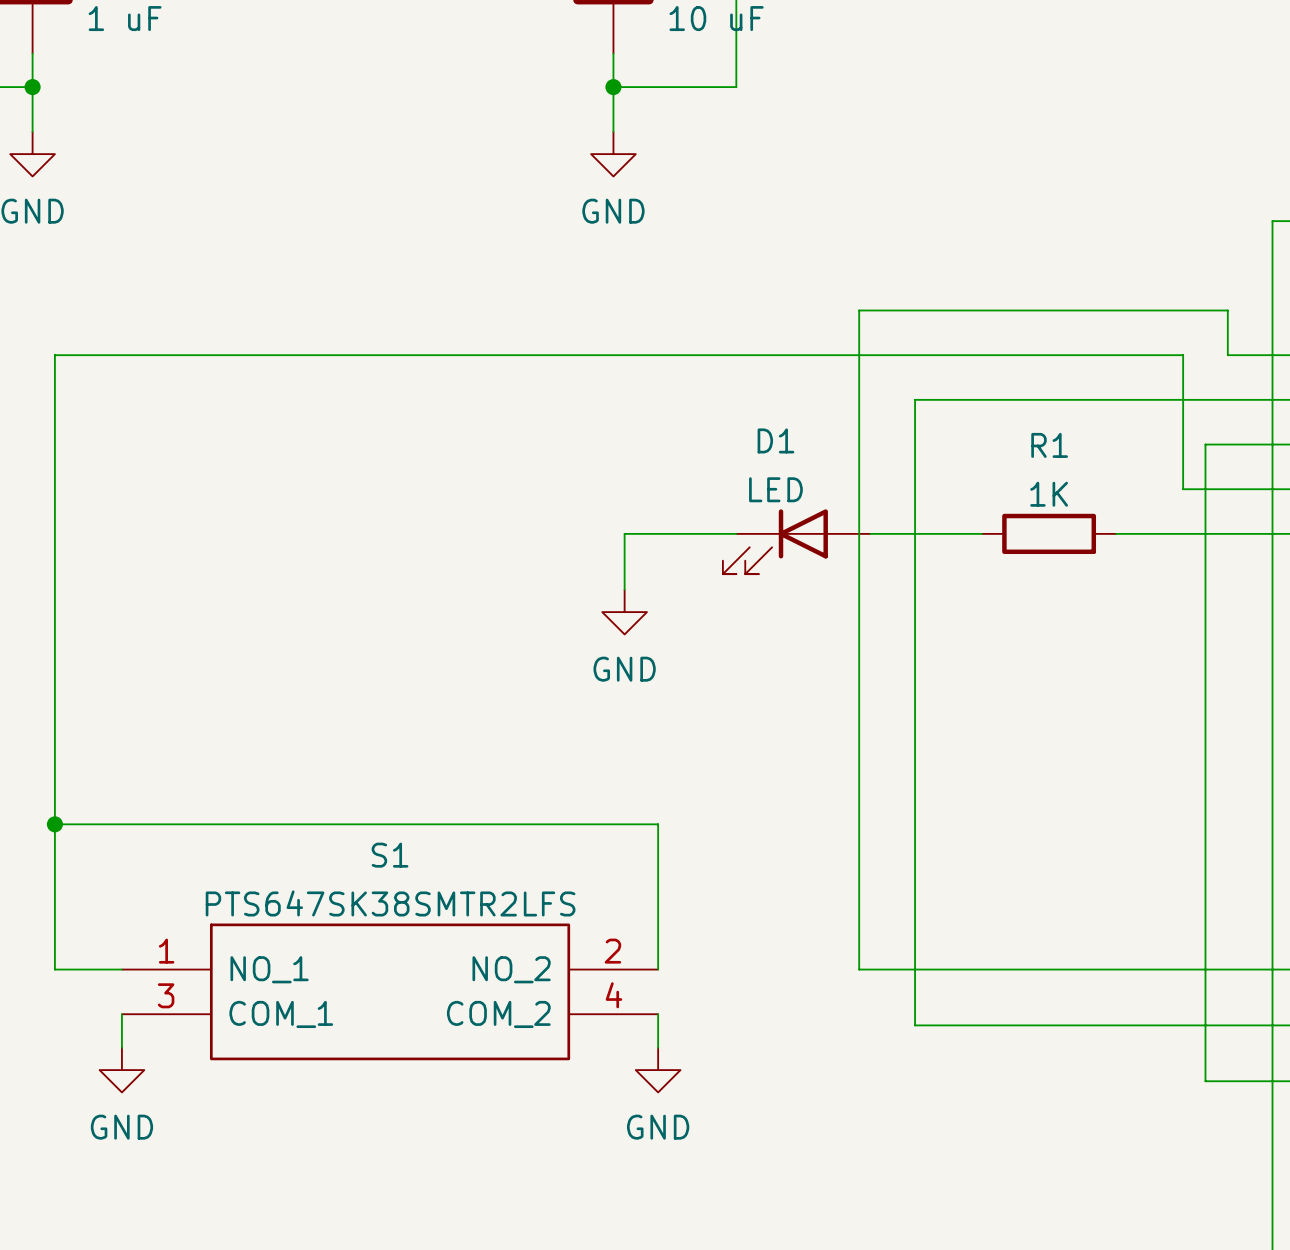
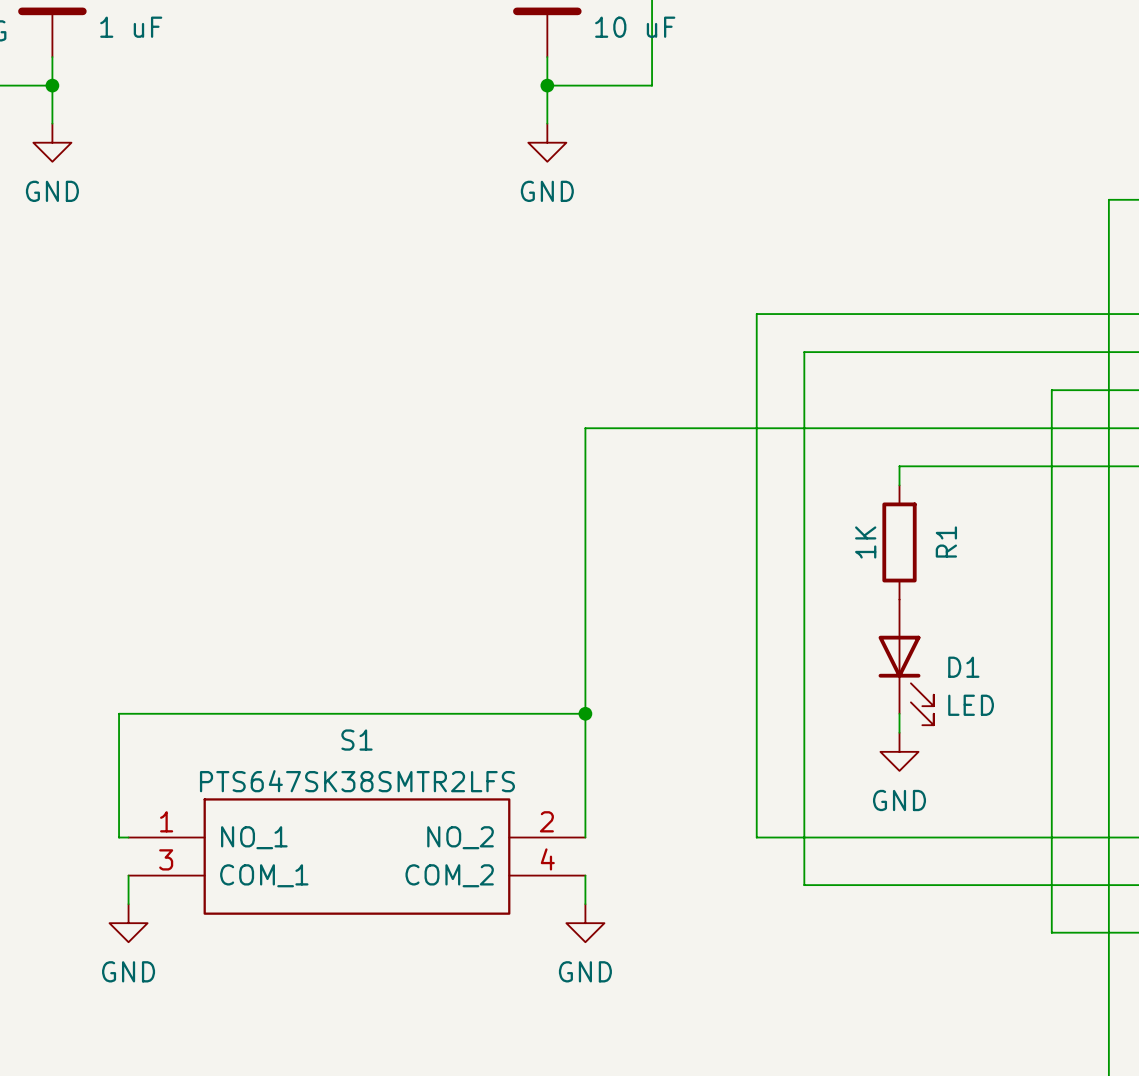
wire: (1183, 355) (1183, 489) -> (1032, 314) (1070, 314)
wire: (1227, 355) (1227, 310) (859, 310) (859, 355) (54, 355) (54, 969) (110, 969) -> none
D1 name position: D1 (775, 440) -> D1 (963, 667)
D1 value position: LED (775, 489) -> LED (971, 705)
wire: none -> (1032, 428) (585, 428) (585, 713)
R1 value position: 1K (1049, 494) -> 1K (865, 542)
wire: (736, 533) (624, 533) (624, 589) -> none
wire: (870, 533) (982, 533) -> none
R1 rotation: 0° (1049, 533) -> 90° clockwise (899, 542)
R1 position: (1049, 533) -> (899, 542)
wire: none -> (975, 466) (899, 466) (899, 485)
D1 rotation: 0° (775, 541) -> 90° counterclockwise (906, 680)
D1 position: (796, 541) -> (906, 662)
power symbol: GND (624, 612) -> none
wire: (54, 824) (110, 824) -> (119, 837) (119, 713)
junction: (54, 824) -> none
junction: none -> (585, 713)
wire: none -> (899, 713) (899, 732)
power symbol: none -> GND (899, 751)

